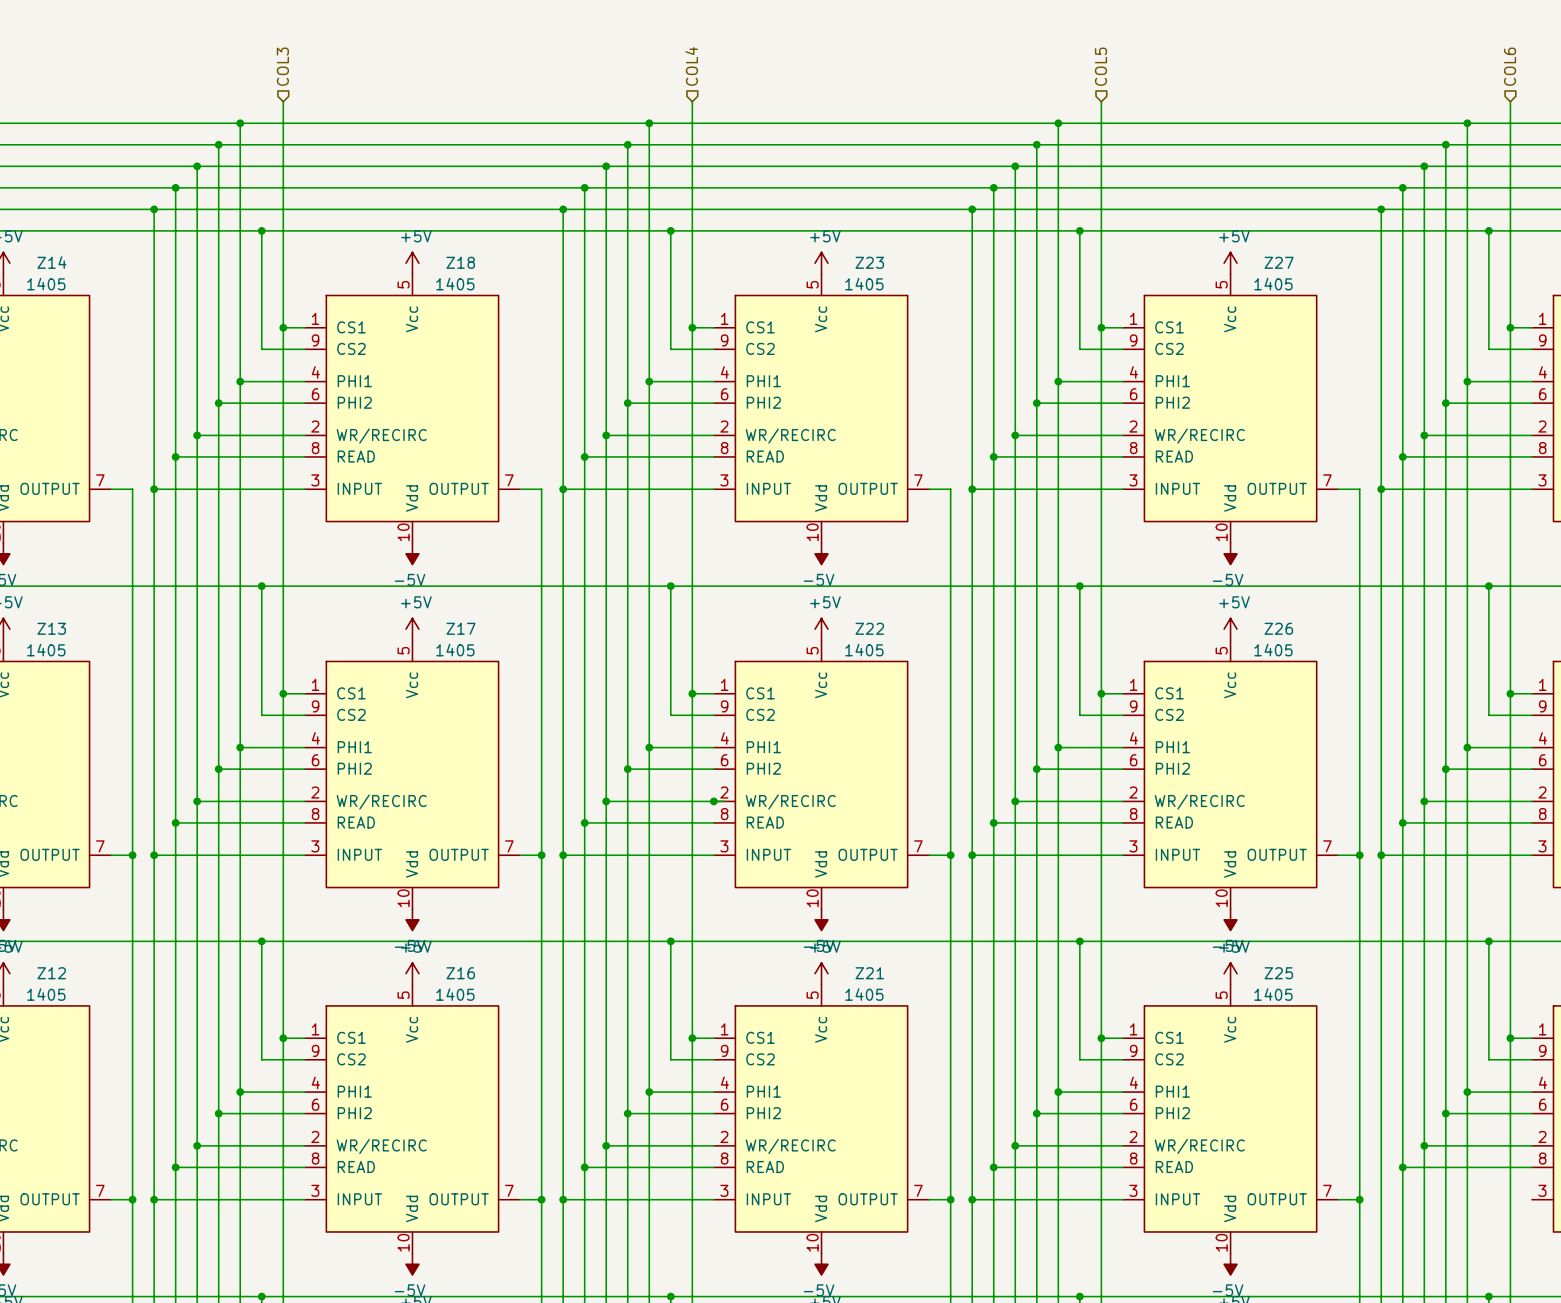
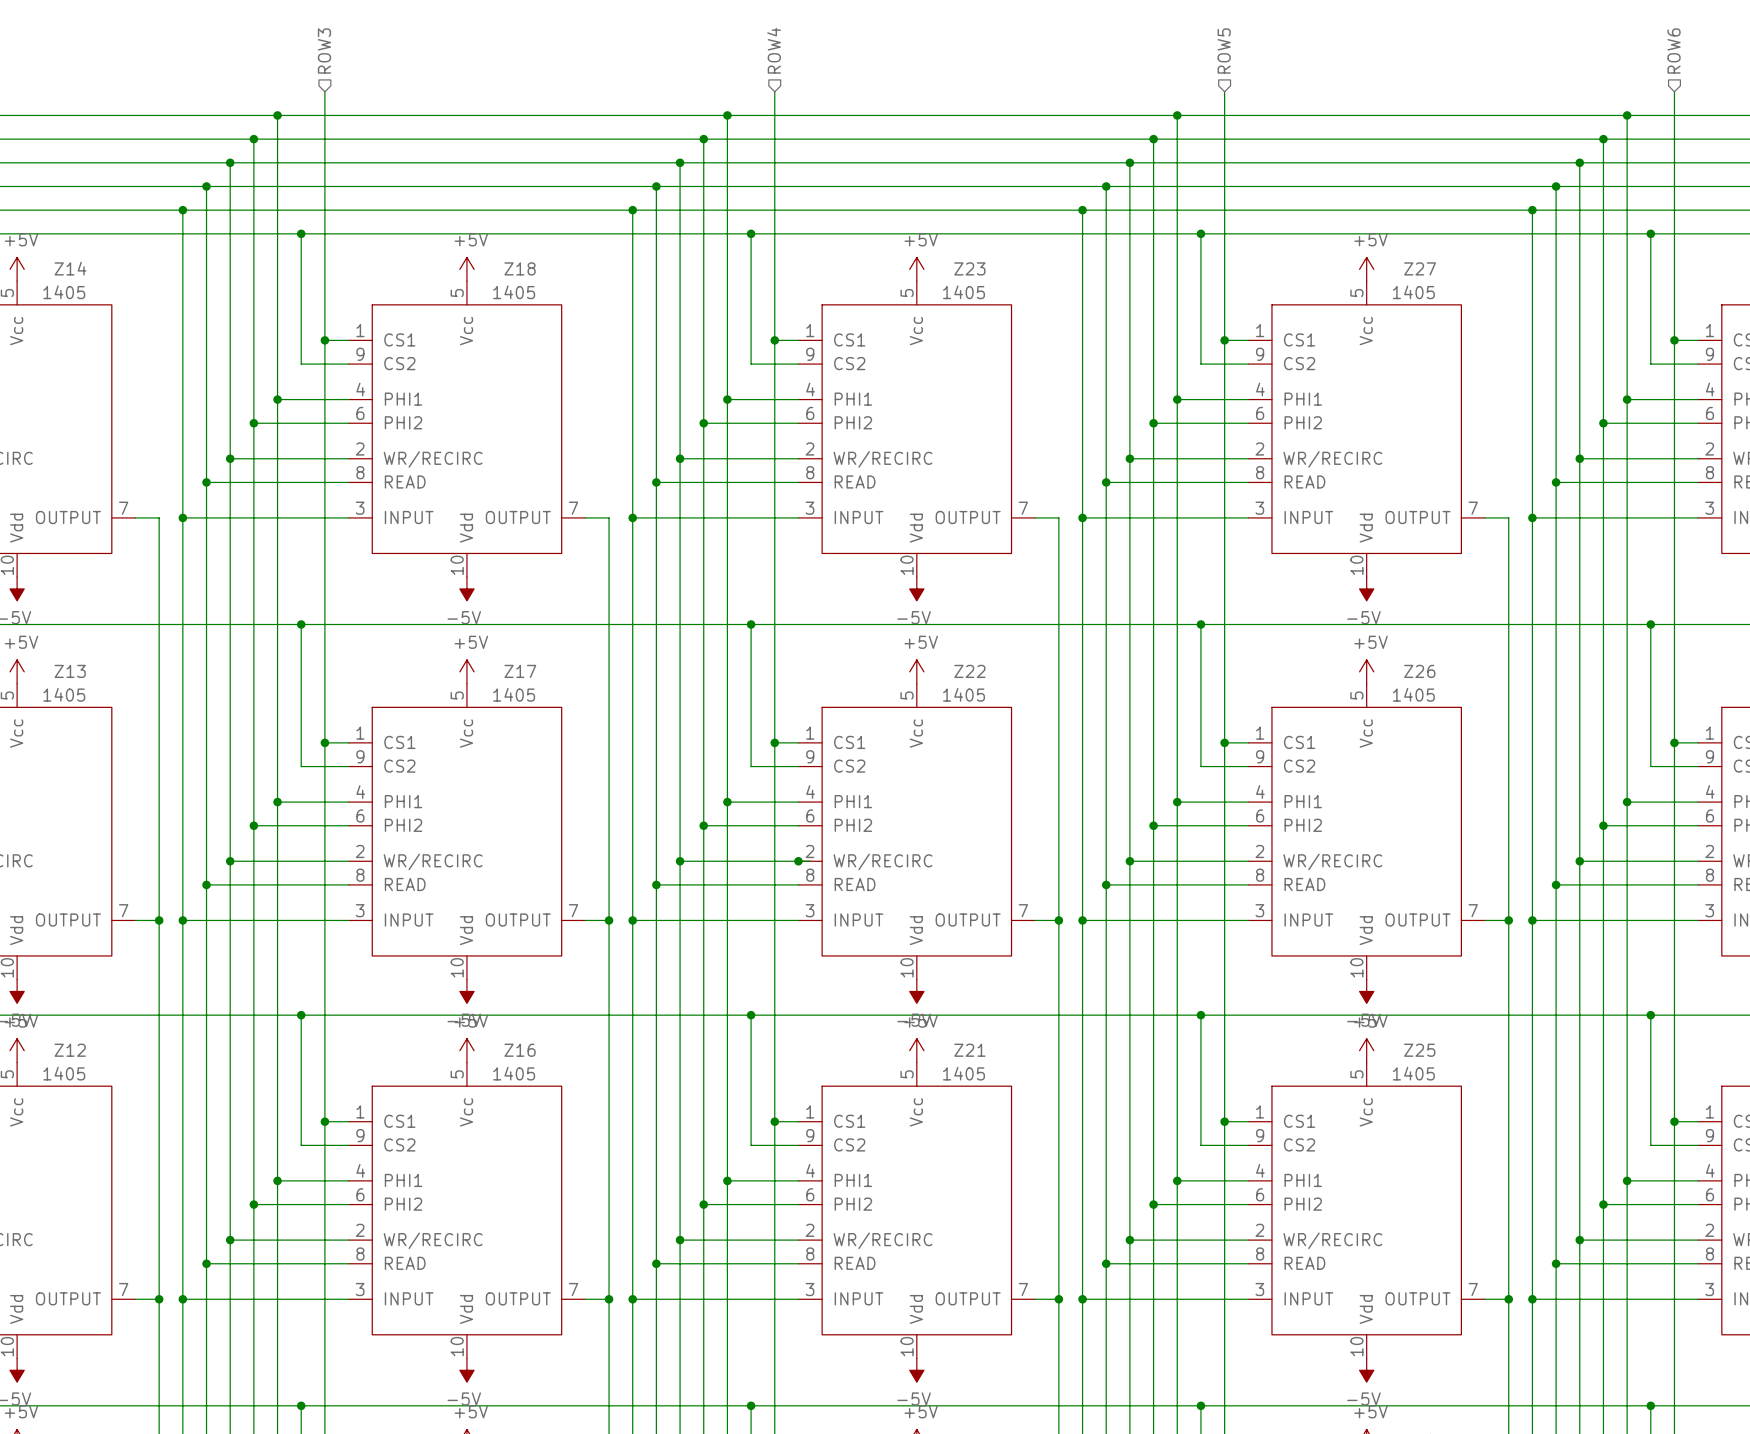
hierarchical label: COL3 (282, 66) -> ROW3 (324, 51)
hierarchical label: COL4 (691, 66) -> ROW4 (774, 50)
hierarchical label: COL5 (1100, 66) -> ROW5 (1224, 51)
hierarchical label: COL6 (1510, 66) -> ROW6 (1674, 51)
wire: none -> (1532, 1299) (1698, 1299)
junction: none -> (1532, 1299)

